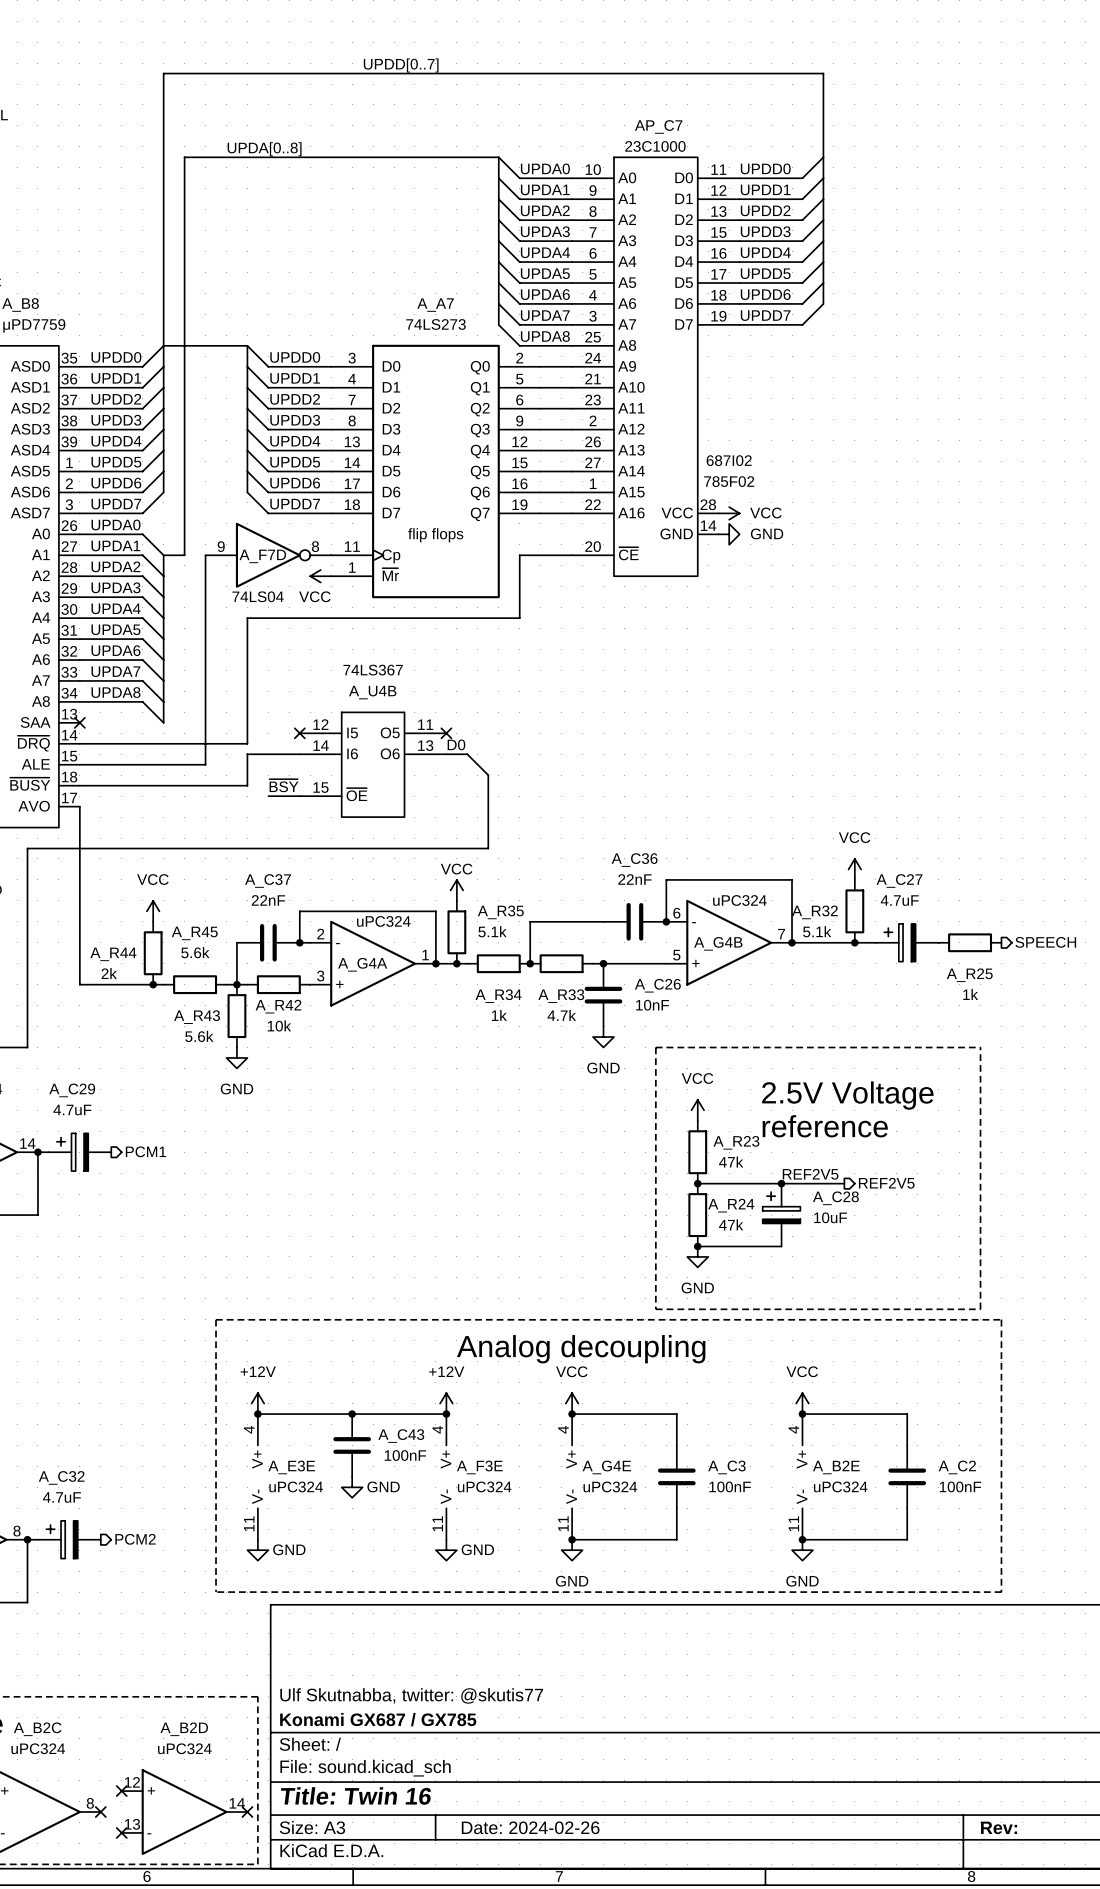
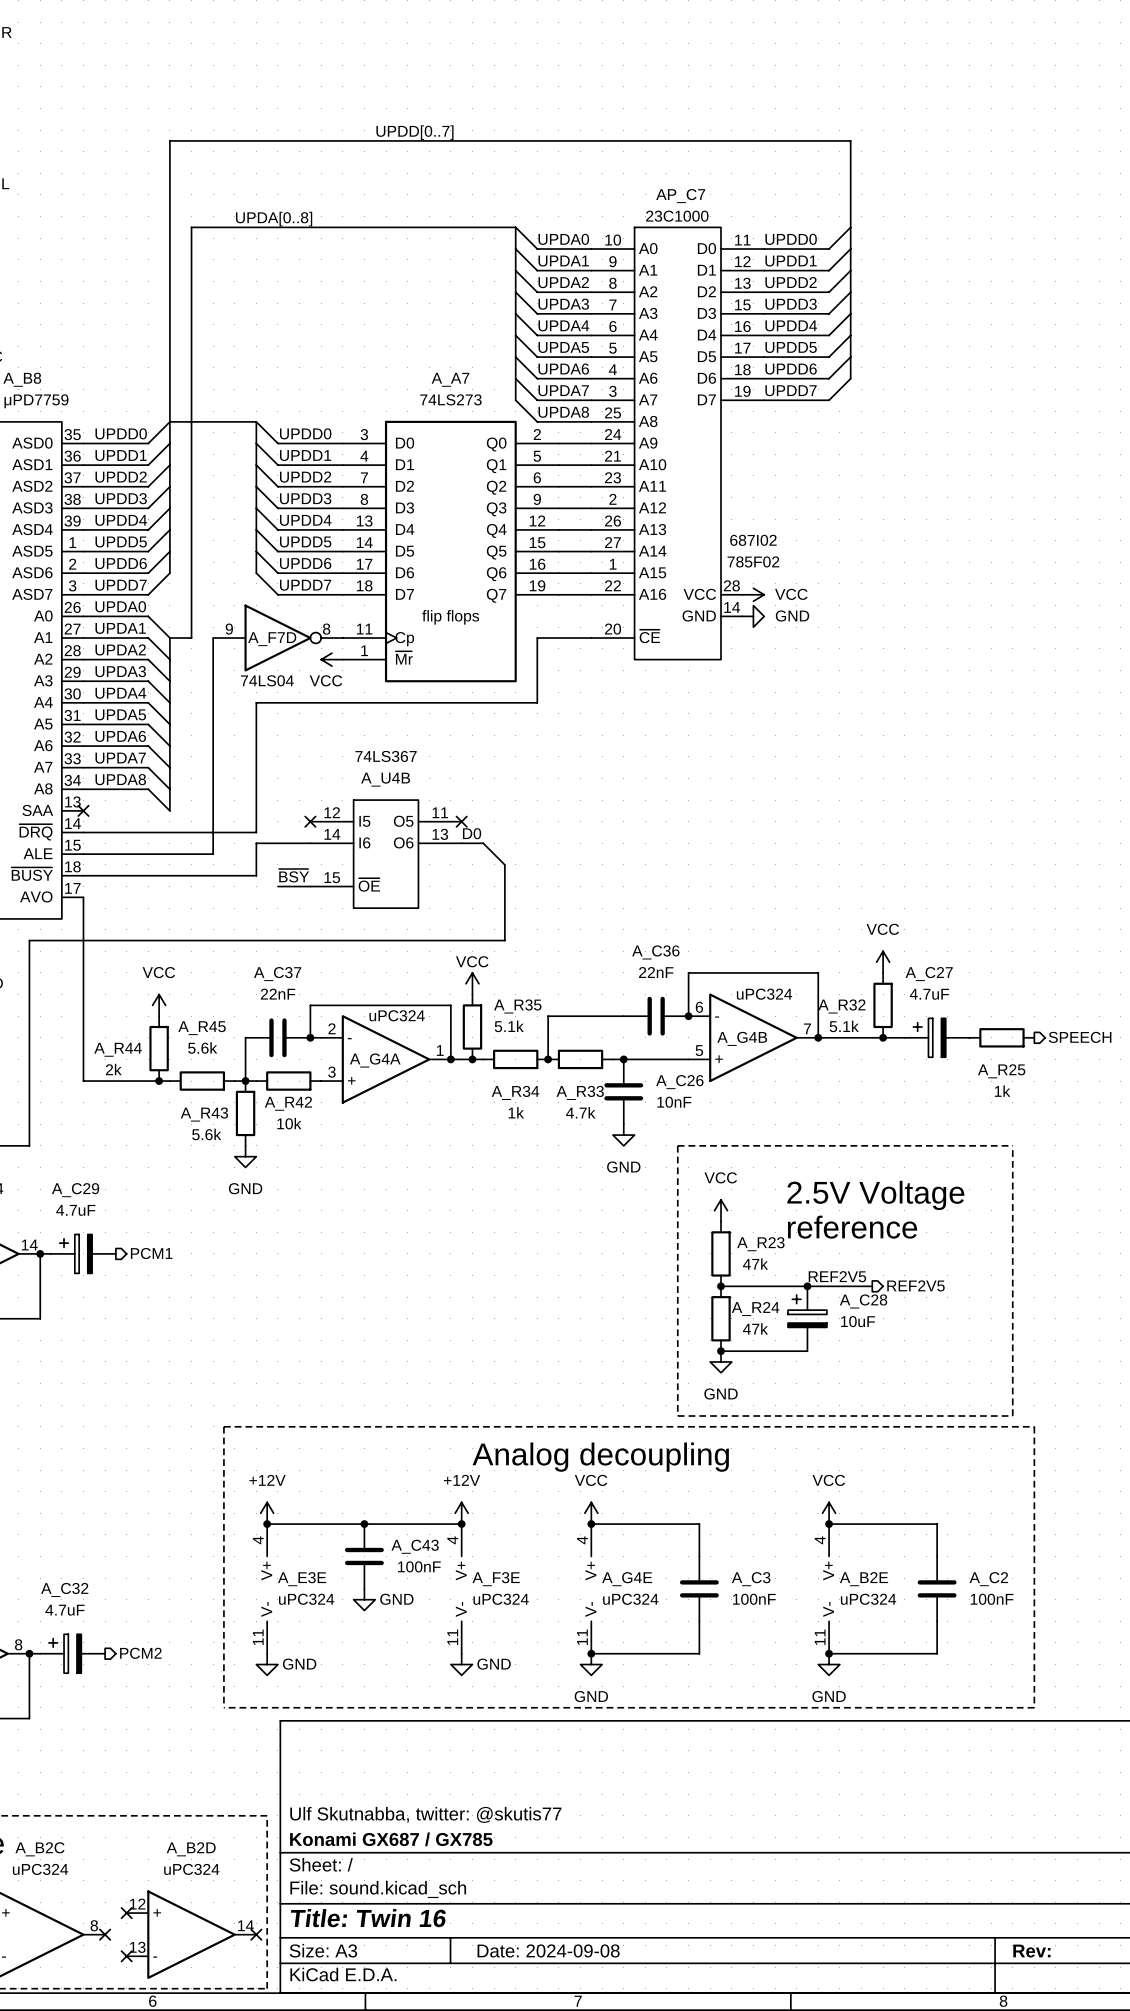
title block: Date: 2024-02-26 (530, 1827) -> Date: 2024-09-08 (548, 1950)

